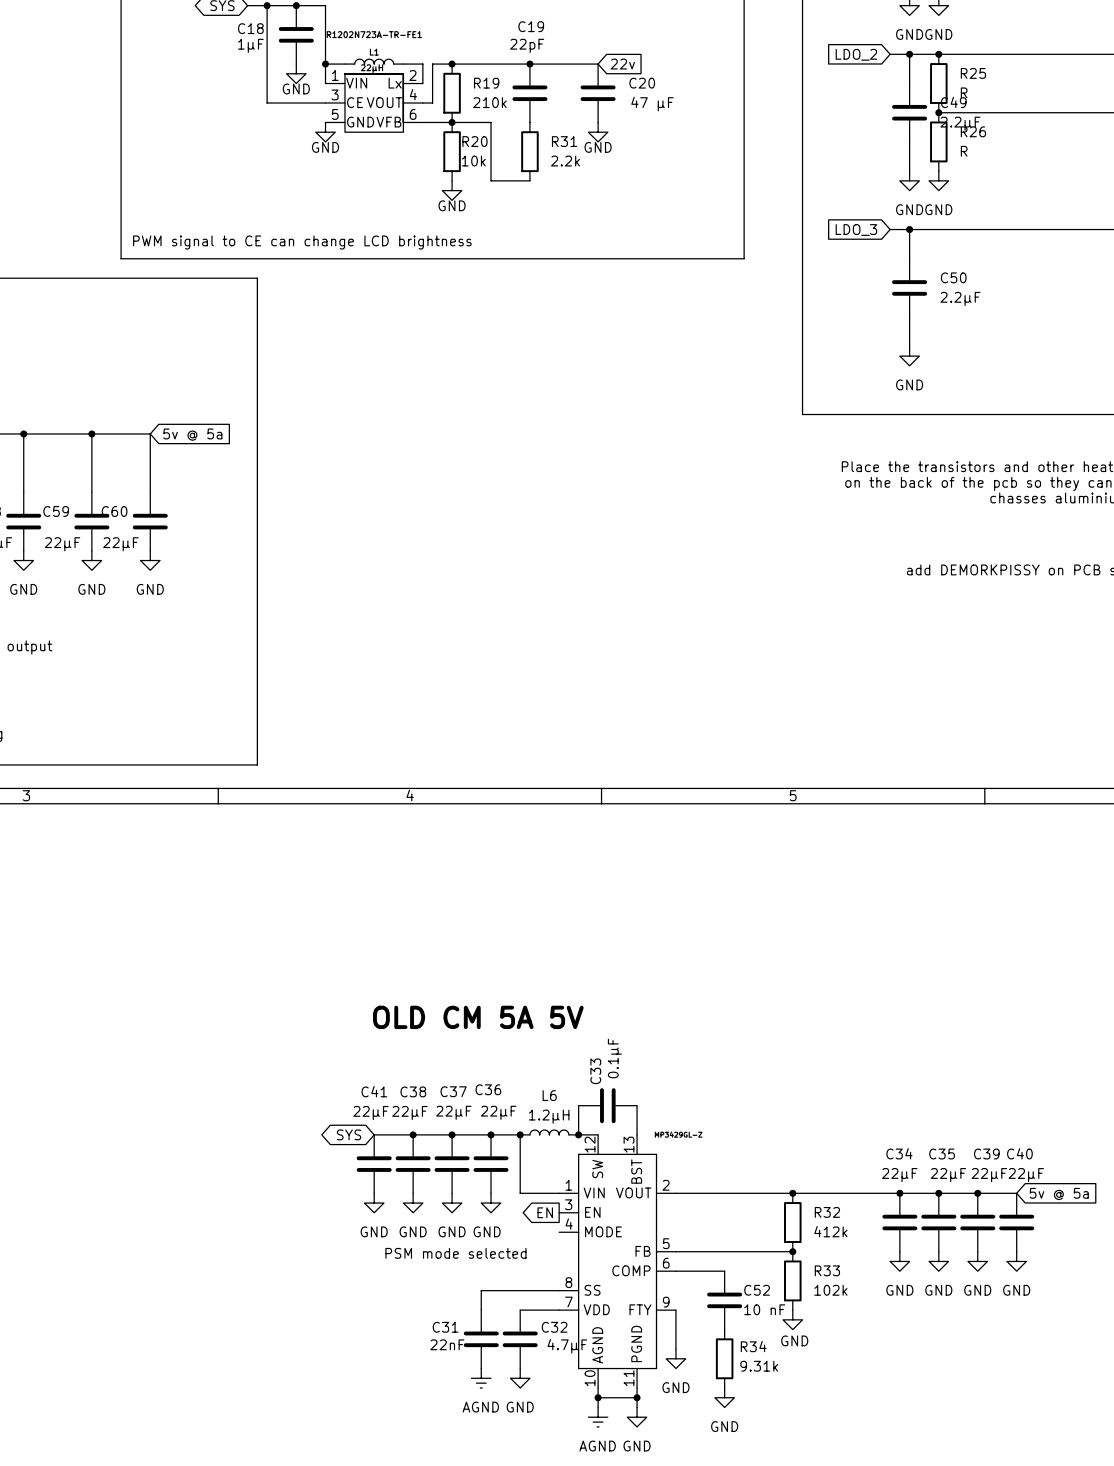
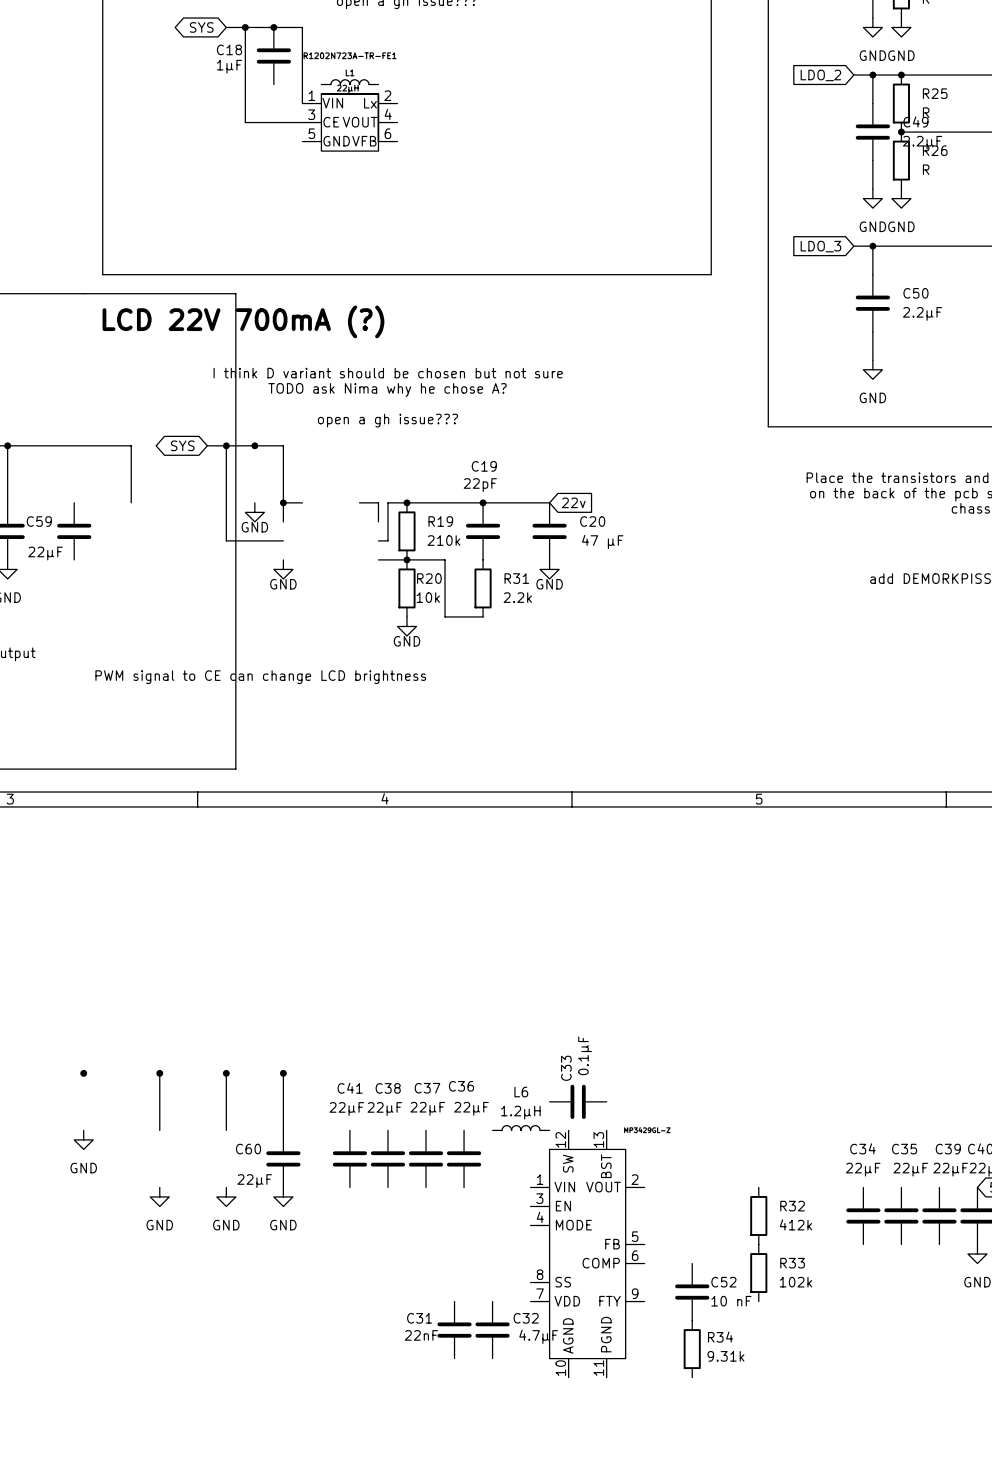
wire: (325, 64) (344, 64) -> none
junction: (325, 64) -> none
wire: (403, 64) (422, 64) (422, 83) -> none
junction: (452, 64) -> none
junction: (529, 64) -> none
wire: (598, 64) (432, 64) (432, 102) (422, 102) -> none
global label: 22v (622, 64) -> none
power symbol: GND (296, 73) -> none
R19 position: (452, 93) -> (406, 531)
C19 position: (529, 93) -> (483, 531)
C20 position: (598, 93) -> (549, 531)
wire: (422, 122) (491, 122) (491, 180) (529, 180) -> none
junction: (452, 122) -> none
power symbol: GND (325, 132) -> none
power symbol: GND (598, 132) -> none
R20 position: (452, 151) -> (406, 588)
R31 position: (529, 151) -> (483, 588)
power symbol: GND (452, 190) -> none
text: PWM signal to CE can change LCD brightness (302, 242) -> none
text: none -> LCD 22V 700mA (?) (243, 321)
text: none -> I think D variant should be chosen but not sure (388, 373)
text: none -> TODO ask Nima why he chose A? (387, 389)
text: none -> open a gh issue??? (387, 420)
wire: (91, 433) (91, 492) -> none
junction: (91, 433) -> none
global label: none -> SYS (182, 445)
wire: none -> (207, 445) (283, 445) (283, 521)
wire: none -> (226, 445) (226, 540) (283, 540)
junction: none -> (226, 445)
junction: none -> (254, 445)
global label: 5v @ 5a (192, 434) -> none
wire: none -> (283, 502) (302, 502)
junction: none -> (283, 502)
wire: none -> (359, 502) (378, 502) (378, 521)
junction: none -> (406, 502)
junction: none -> (483, 502)
wire: none -> (549, 502) (387, 502) (387, 540) (378, 540)
global label: none -> 22v (573, 502)
power symbol: none -> GND (254, 512)
C60 position: (150, 521) -> (283, 1158)
wire: none -> (378, 559) (445, 559) (445, 616) (483, 616)
junction: none -> (406, 559)
power symbol: GND (91, 560) -> none
power symbol: GND (150, 560) -> none
power symbol: none -> GND (283, 569)
power symbol: none -> GND (549, 569)
power symbol: none -> GND (406, 626)
text: none -> PWM signal to CE can change LCD brightness (260, 677)
text: OLD CM 5A 5V (478, 1017) -> none
junction: none -> (83, 1073)
wire: none -> (159, 1073) (159, 1130)
junction: none -> (159, 1073)
wire: none -> (226, 1073) (226, 1130)
junction: none -> (226, 1073)
wire: none -> (283, 1073) (283, 1130)
junction: none -> (283, 1073)
wire: (578, 1105) (578, 1134) (598, 1134) -> none
wire: (637, 1105) (637, 1134) -> none
global label: SYS (349, 1134) -> none
wire: (374, 1134) (520, 1134) (520, 1193) (559, 1193) -> none
junction: (413, 1134) -> none
junction: (452, 1134) -> none
junction: (491, 1134) -> none
junction: (520, 1134) -> none
junction: (578, 1134) -> none
power symbol: none -> GND (83, 1139)
wire: (675, 1193) (1016, 1193) -> none
junction: (792, 1193) -> none
junction: (899, 1193) -> none
junction: (938, 1193) -> none
junction: (977, 1193) -> none
power symbol: none -> GND (159, 1196)
power symbol: none -> GND (226, 1196)
power symbol: none -> GND (283, 1196)
power symbol: GND (374, 1203) -> none
power symbol: GND (413, 1203) -> none
power symbol: GND (452, 1203) -> none
power symbol: GND (491, 1203) -> none
global label: EN (545, 1212) -> none
wire: (675, 1251) (792, 1251) -> none
junction: (792, 1251) -> none
text: PSM mode selected (455, 1253) -> none
power symbol: GND (899, 1261) -> none
power symbol: GND (938, 1261) -> none
power symbol: GND (977, 1261) -> none
wire: (675, 1271) (724, 1271) -> none
wire: (559, 1290) (481, 1290) (481, 1310) -> none
wire: (520, 1310) (559, 1310) -> none
wire: (675, 1310) (675, 1349) -> none
power symbol: GND (792, 1319) -> none
power symbol: GND (675, 1358) -> none
power symbol: AGND (481, 1378) -> none
power symbol: GND (520, 1378) -> none
wire: (598, 1388) (598, 1407) -> none
wire: (637, 1388) (637, 1407) -> none
wire: (598, 1397) (637, 1397) -> none
junction: (598, 1397) -> none
junction: (637, 1397) -> none
power symbol: GND (724, 1397) -> none
power symbol: AGND (598, 1417) -> none
power symbol: GND (637, 1417) -> none

